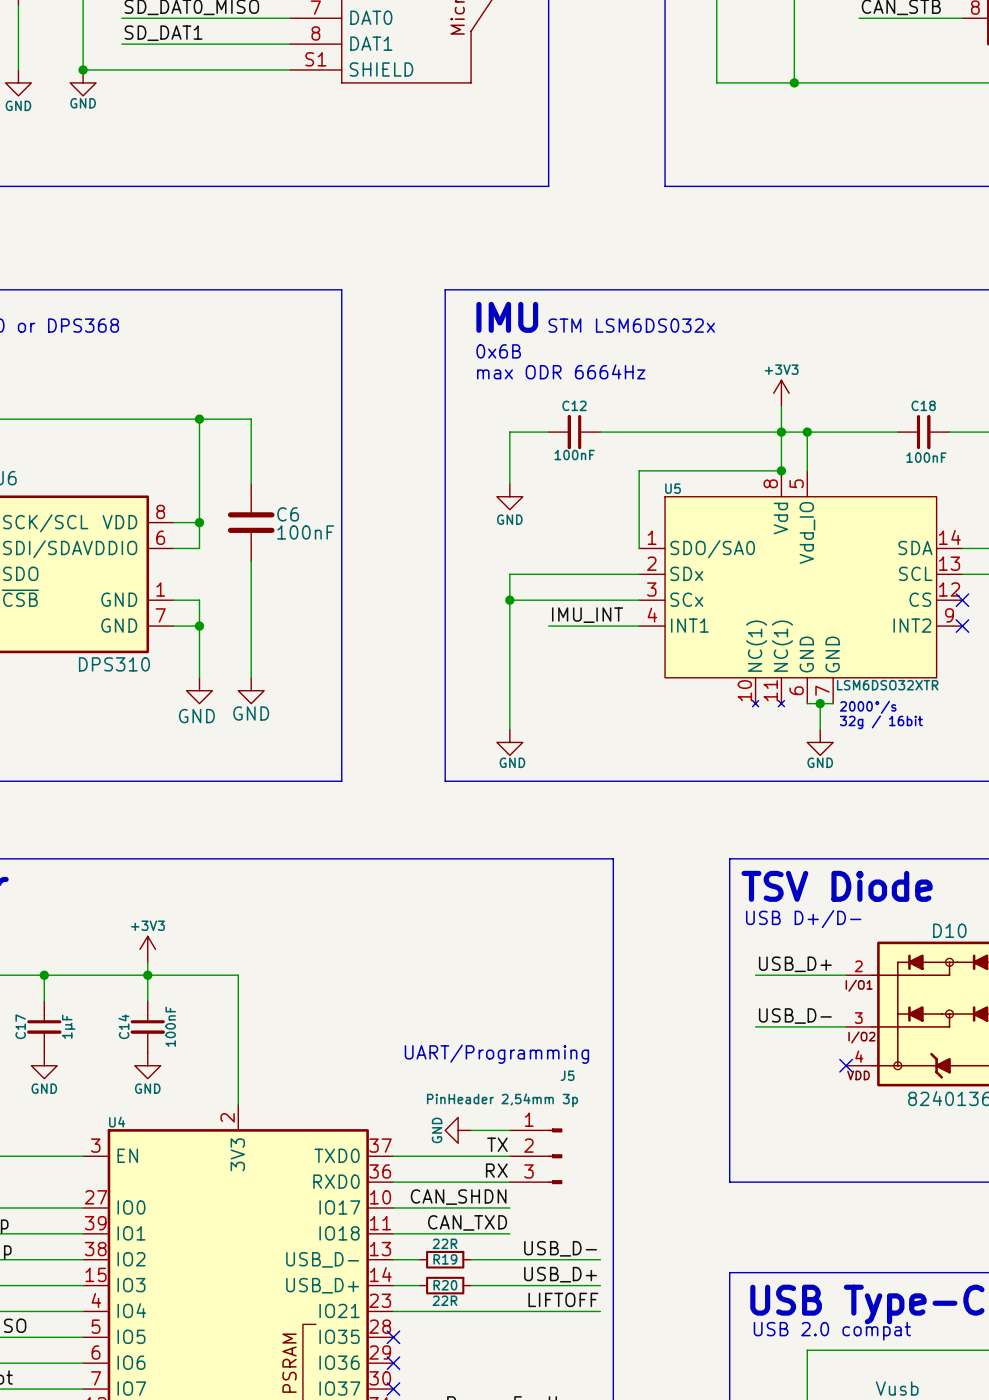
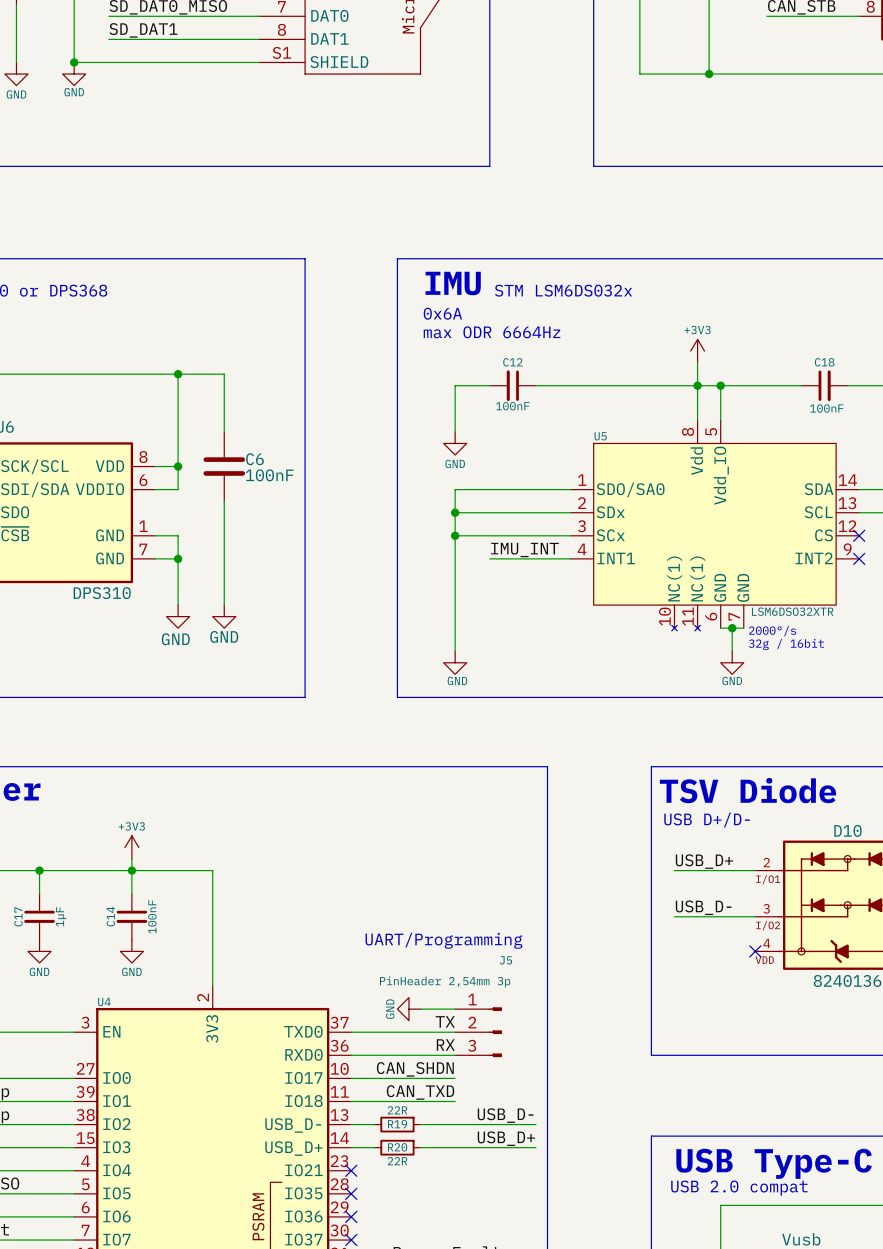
text: 0x6B (498, 351) -> 0x6A (442, 313)
wire: (781, 470) (639, 470) (639, 548) -> (455, 512) (455, 489) (570, 489)
junction: (781, 470) -> none
junction: none -> (455, 512)
label: LIFTOFF (563, 1299) -> none
wire: (393, 1311) (600, 1311) -> none
no-connect mark: none -> (351, 1170)

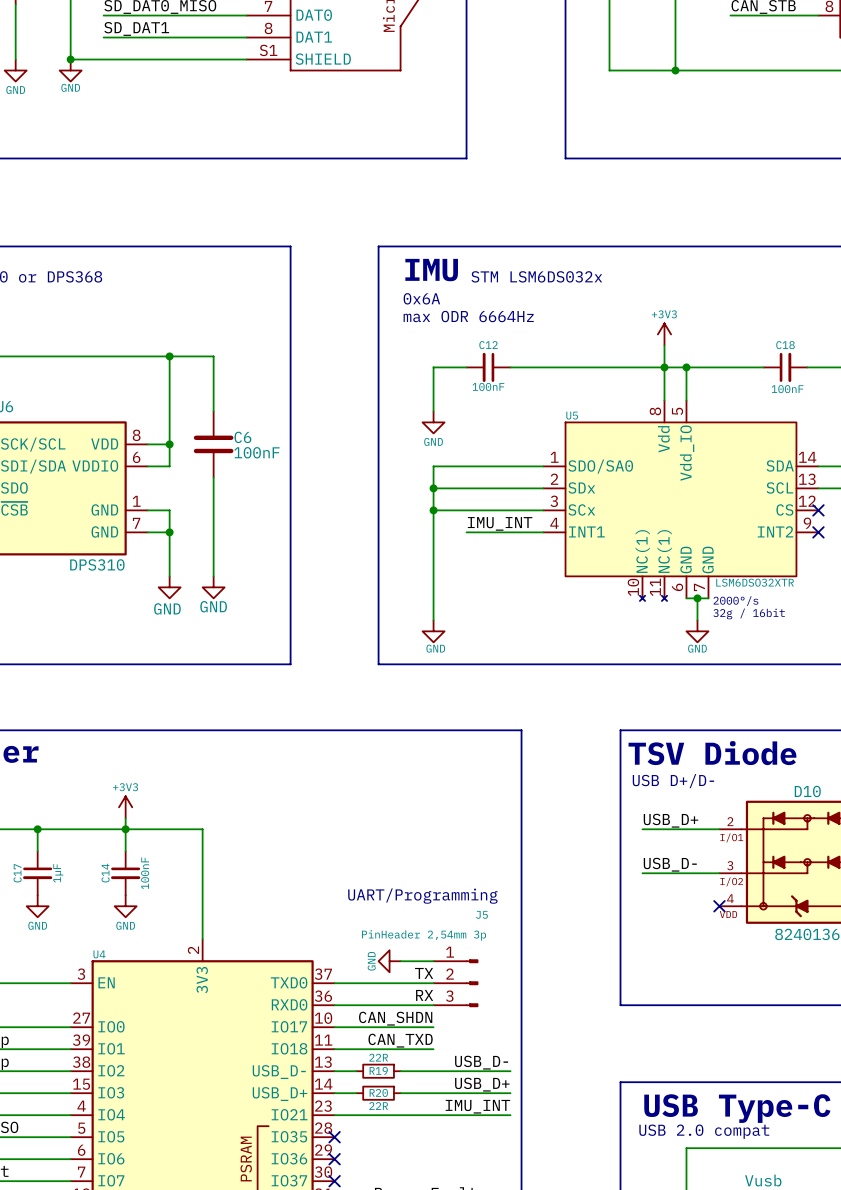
label: none -> IMU_INT (477, 1106)
wire: none -> (334, 1115) (510, 1115)
no-connect mark: (351, 1170) -> none

